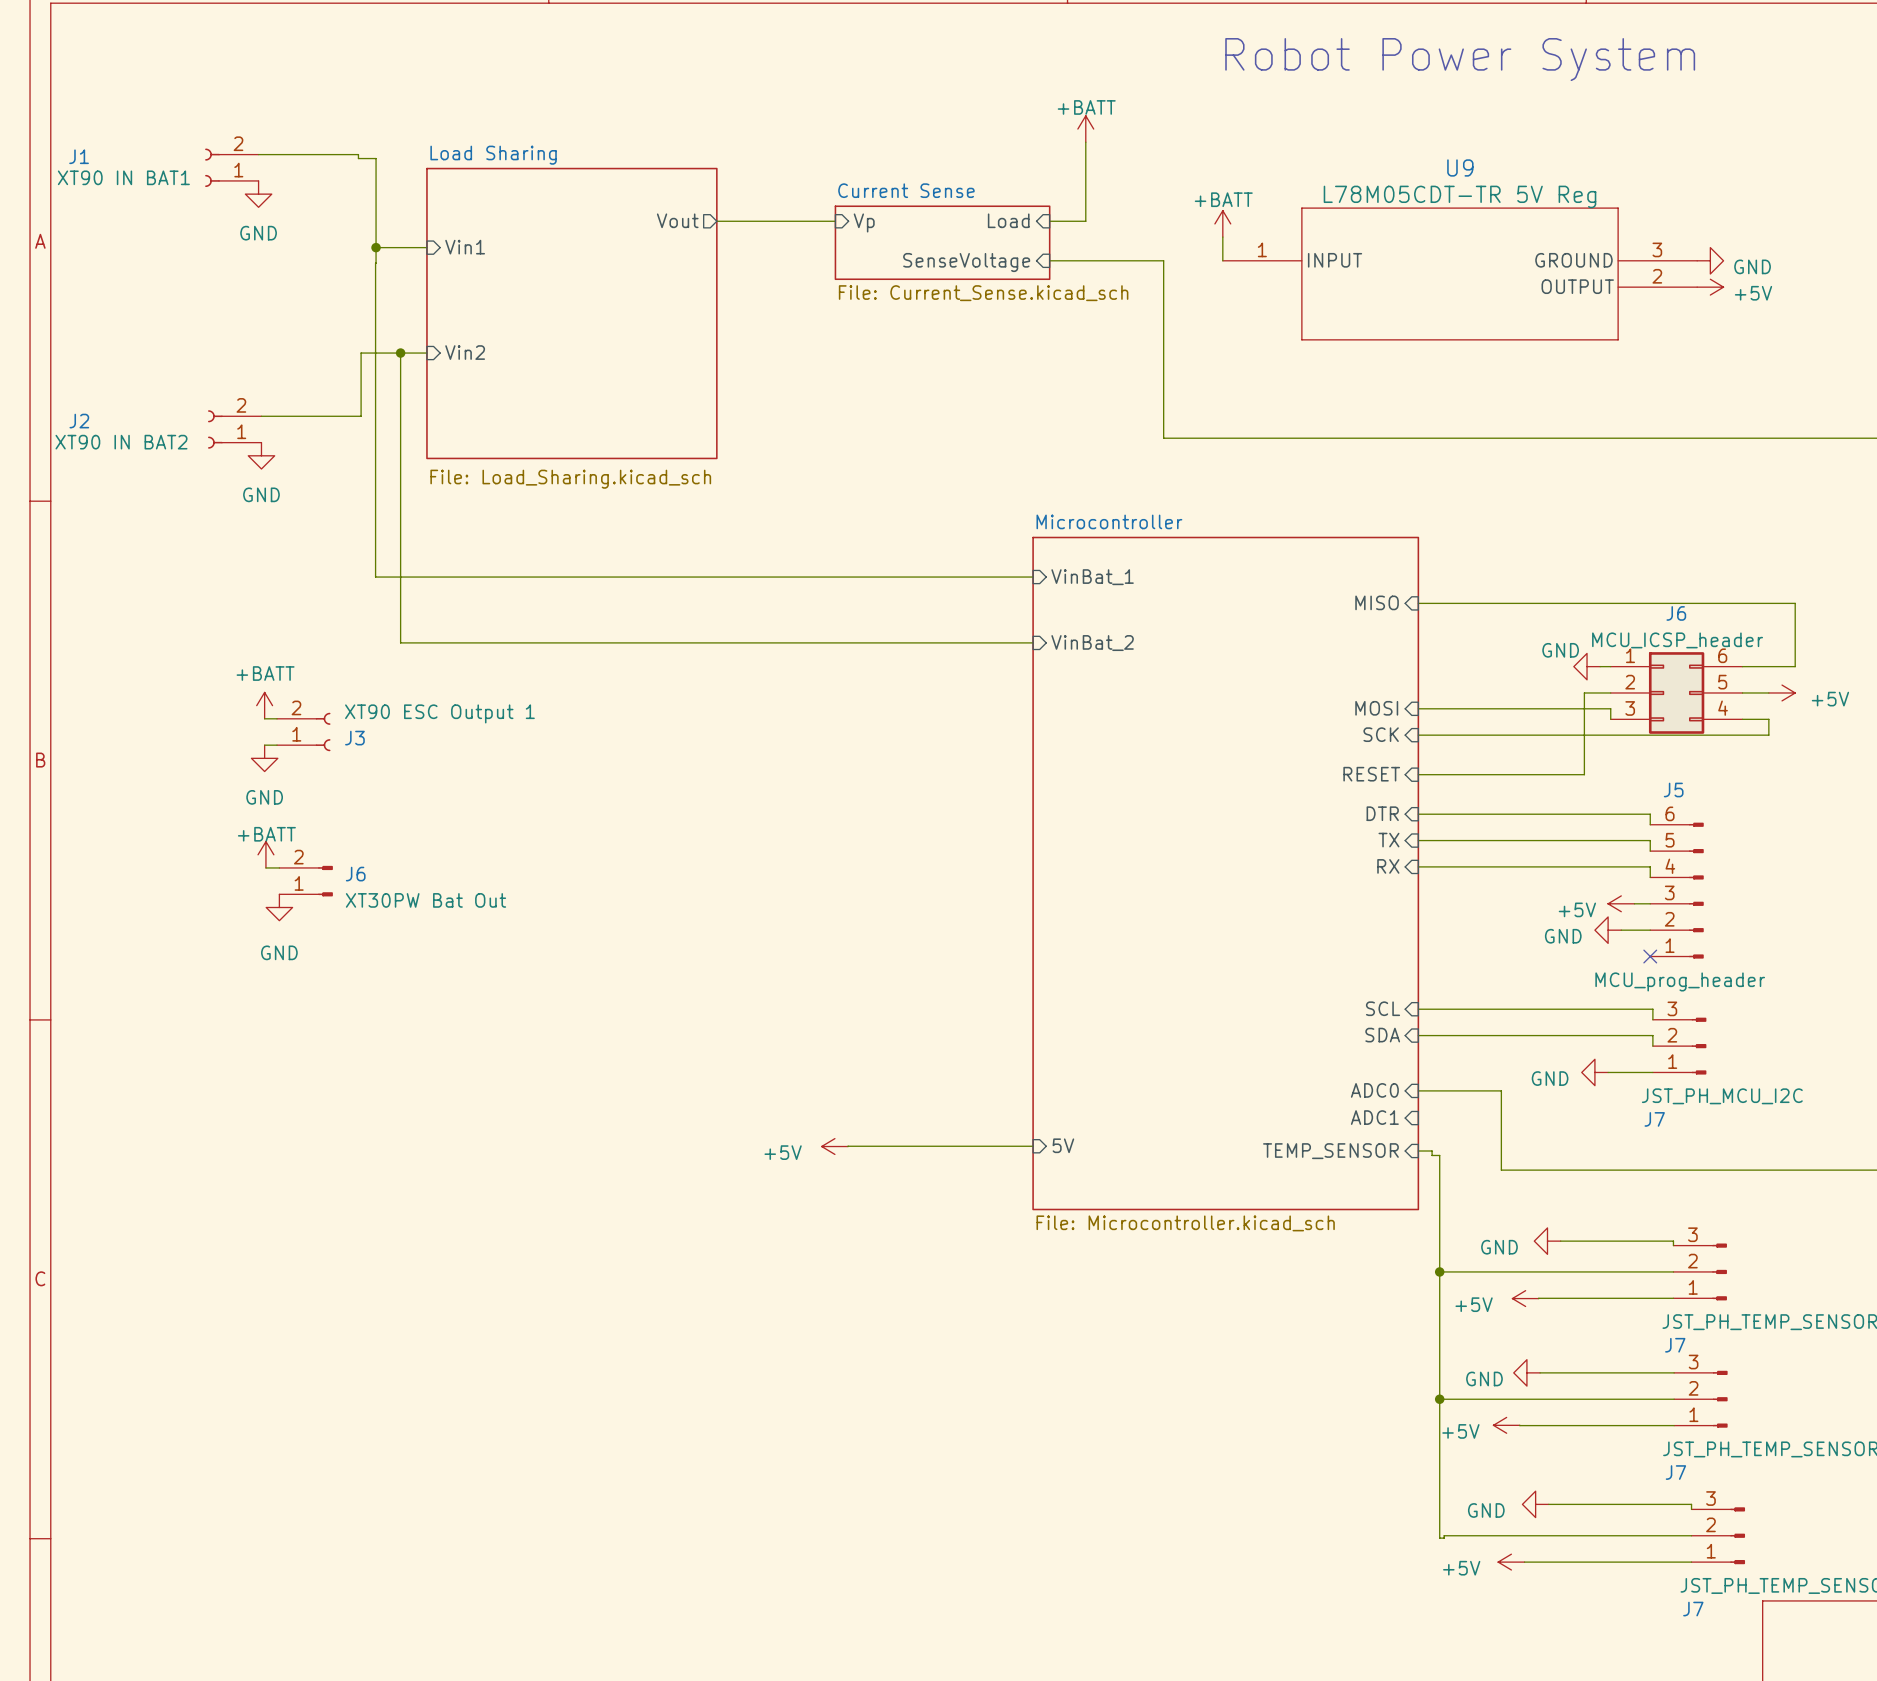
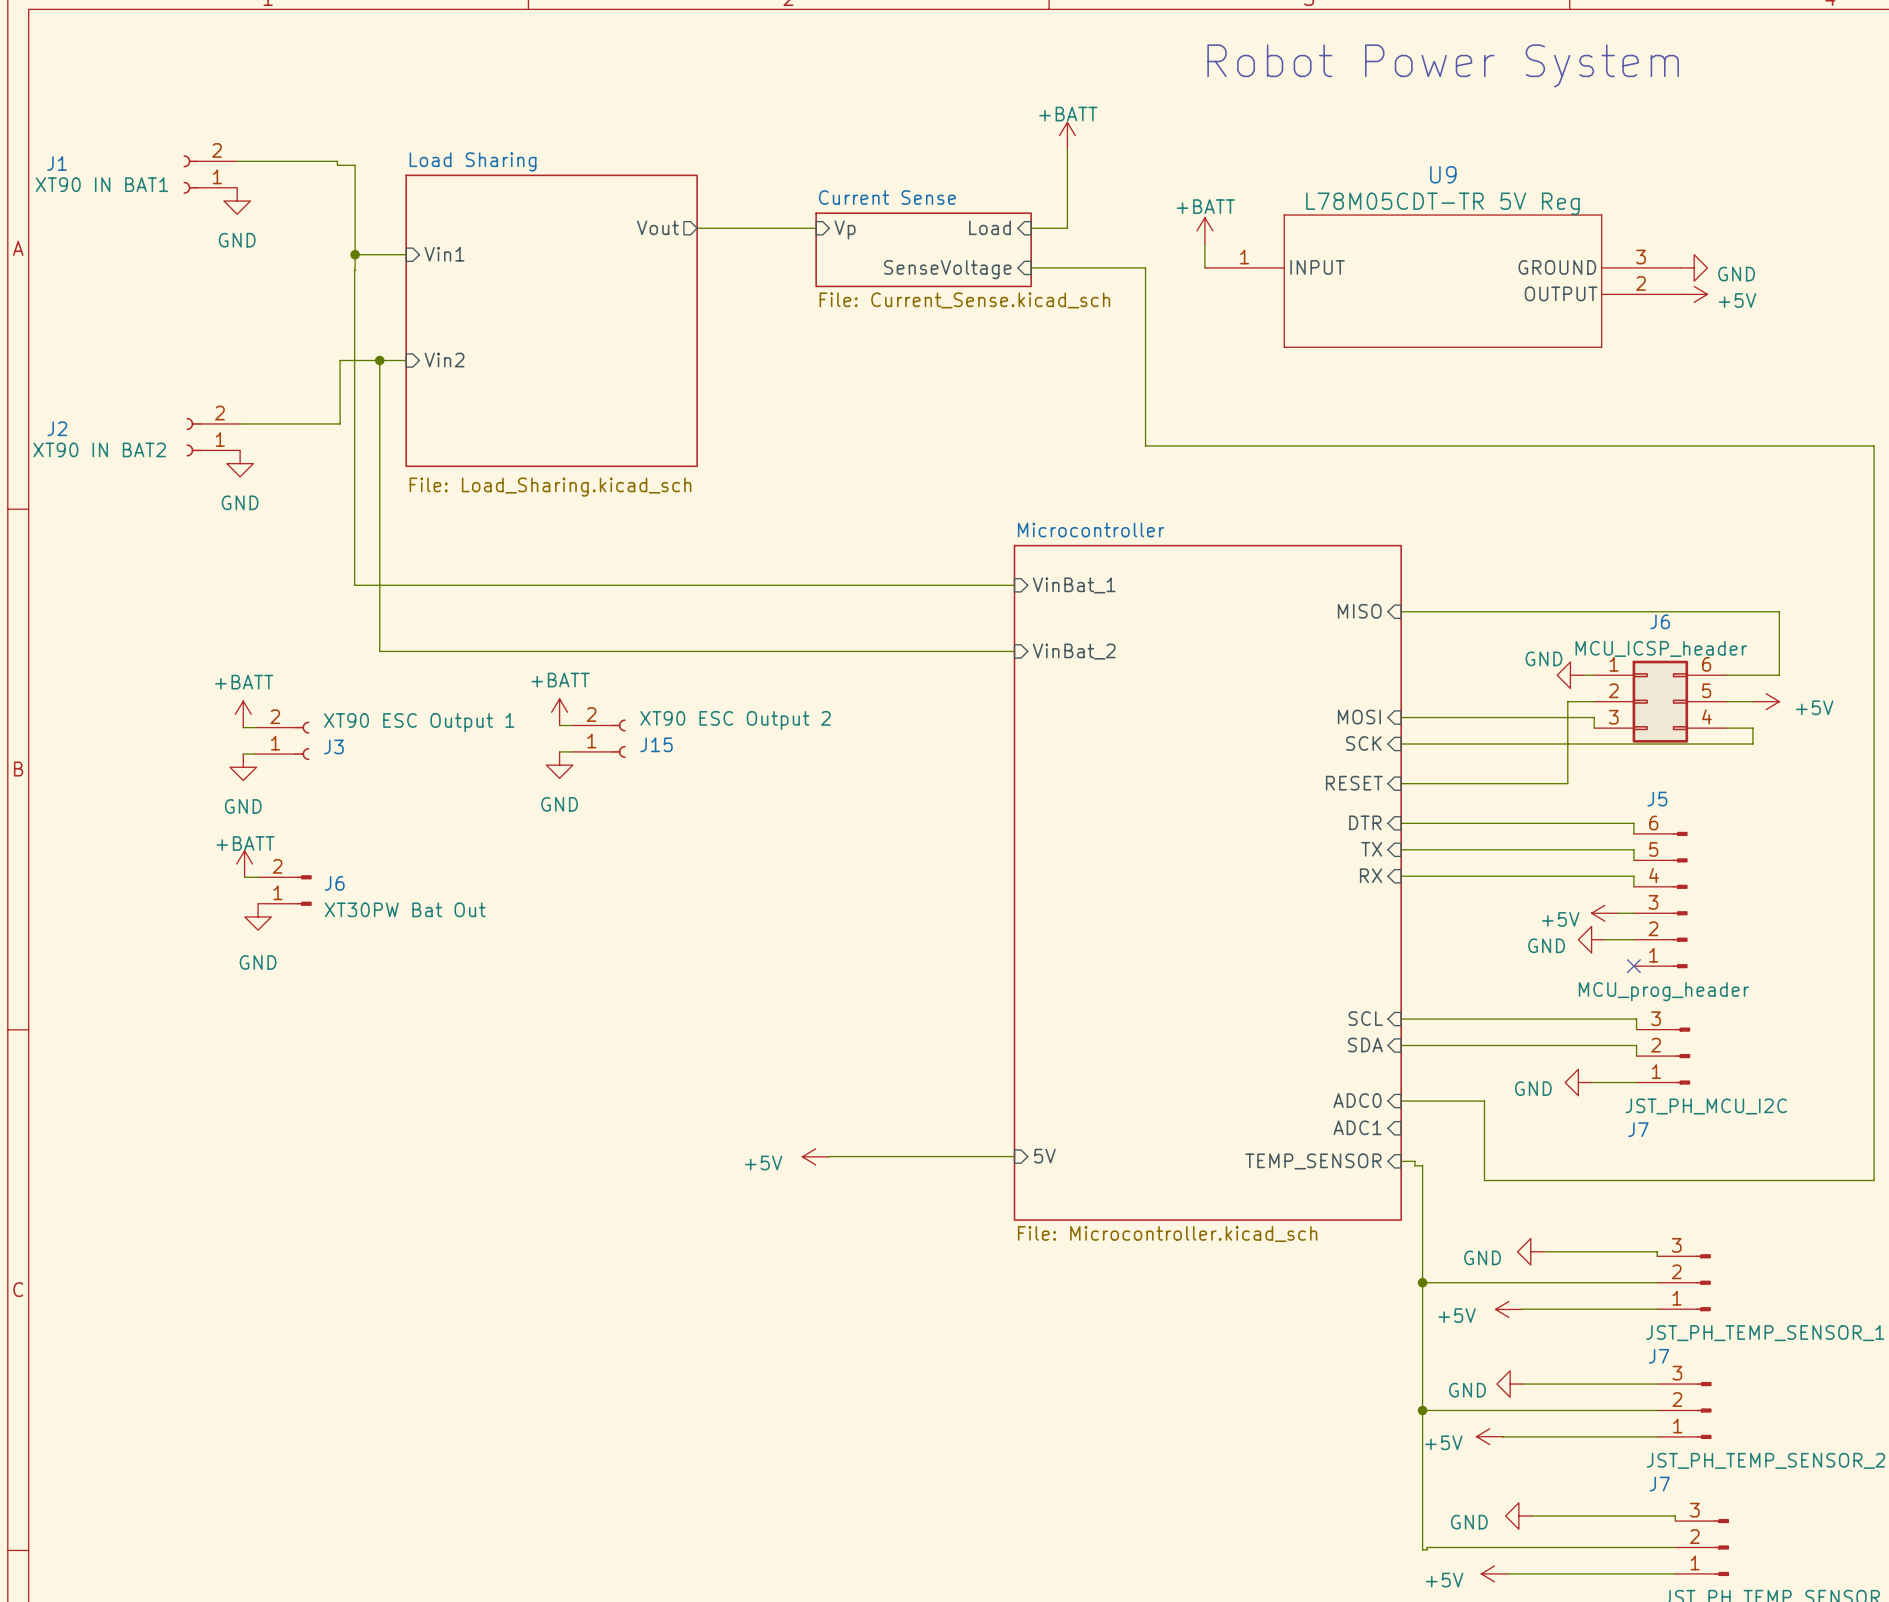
power symbol: none -> +BATT (559, 712)
wire: none -> (559, 725) (572, 725)
J15: none -> XT90 ESC Output 2 (598, 738)
wire: none -> (559, 751) (572, 751)
power symbol: none -> GND (559, 765)

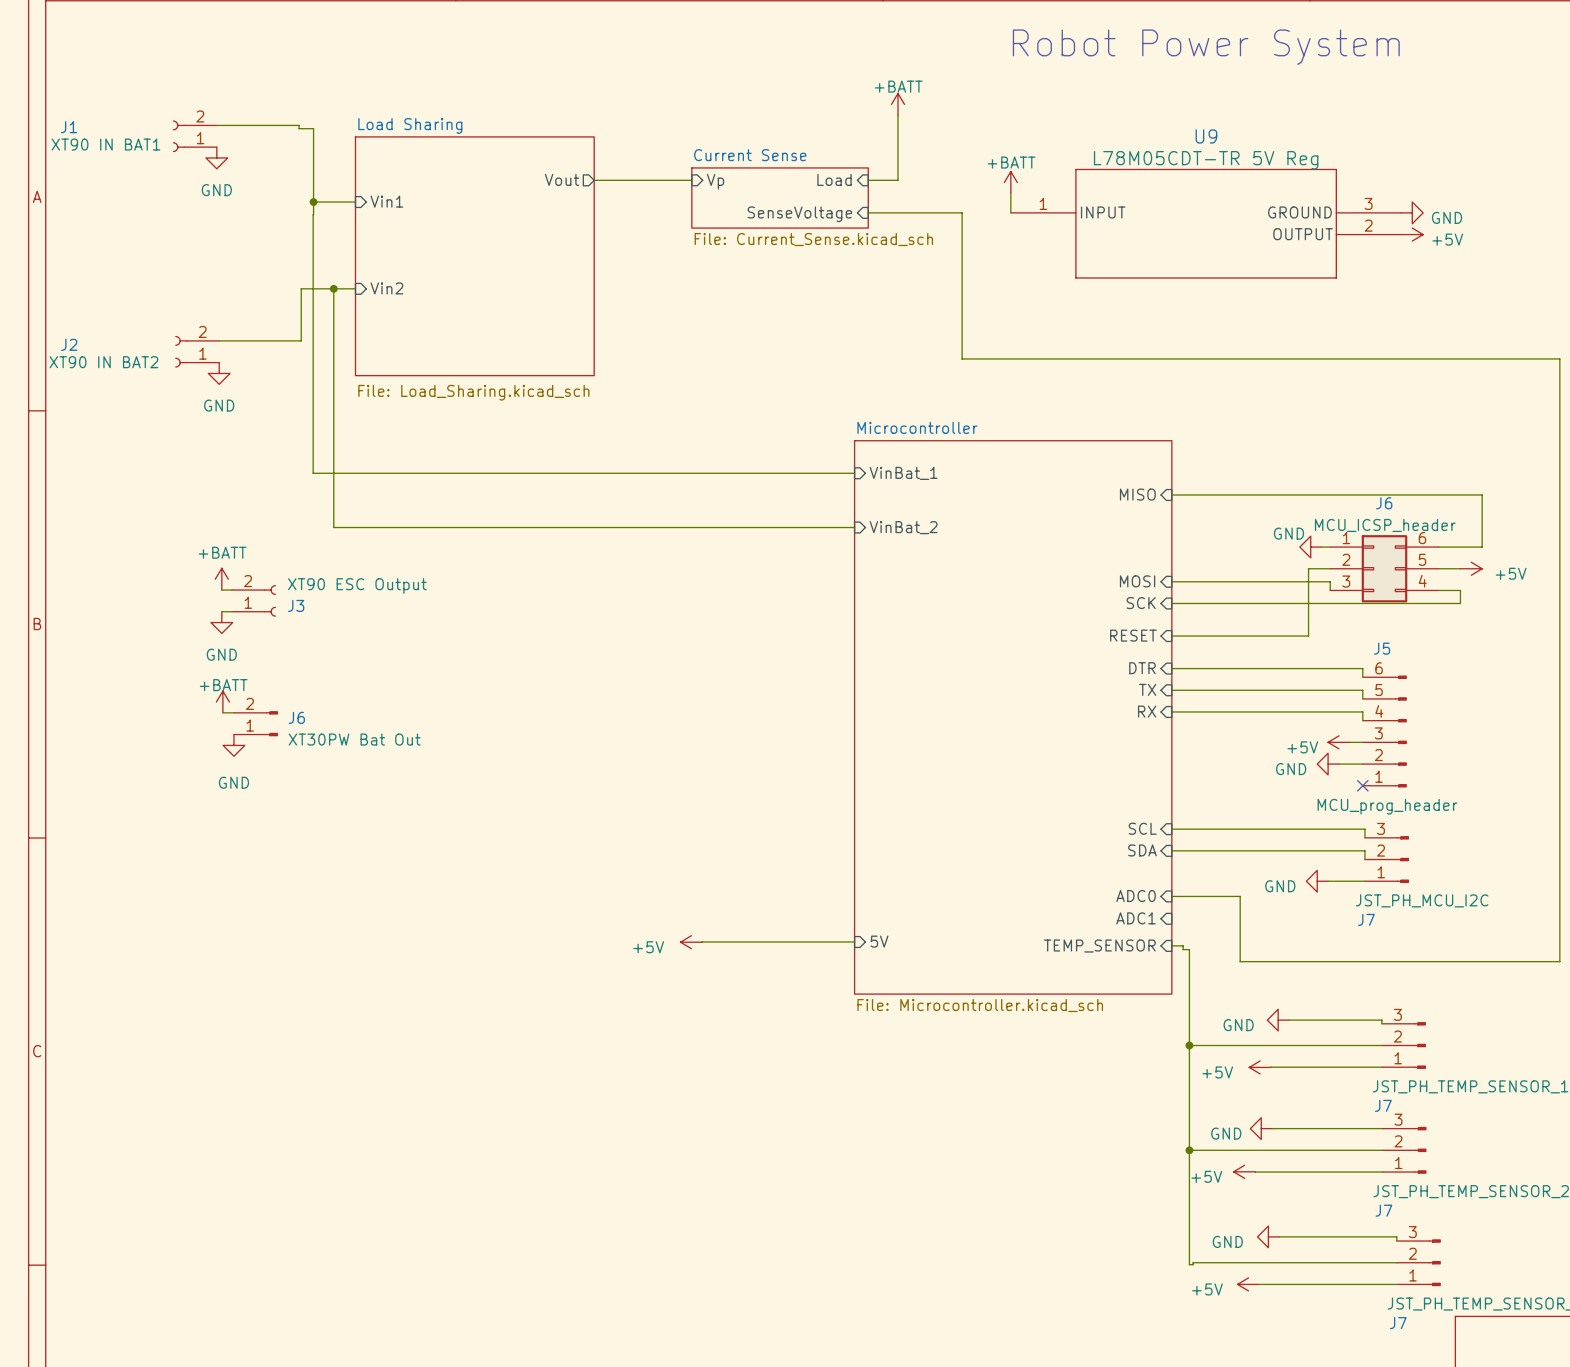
power symbol: +BATT (559, 712) -> none
J3 value: XT90 ESC Output 1 (419, 722) -> XT90 ESC Output (357, 586)
wire: (559, 725) (572, 725) -> none
J15: XT90 ESC Output 2 (598, 738) -> none
wire: (559, 751) (572, 751) -> none
power symbol: GND (559, 765) -> none

